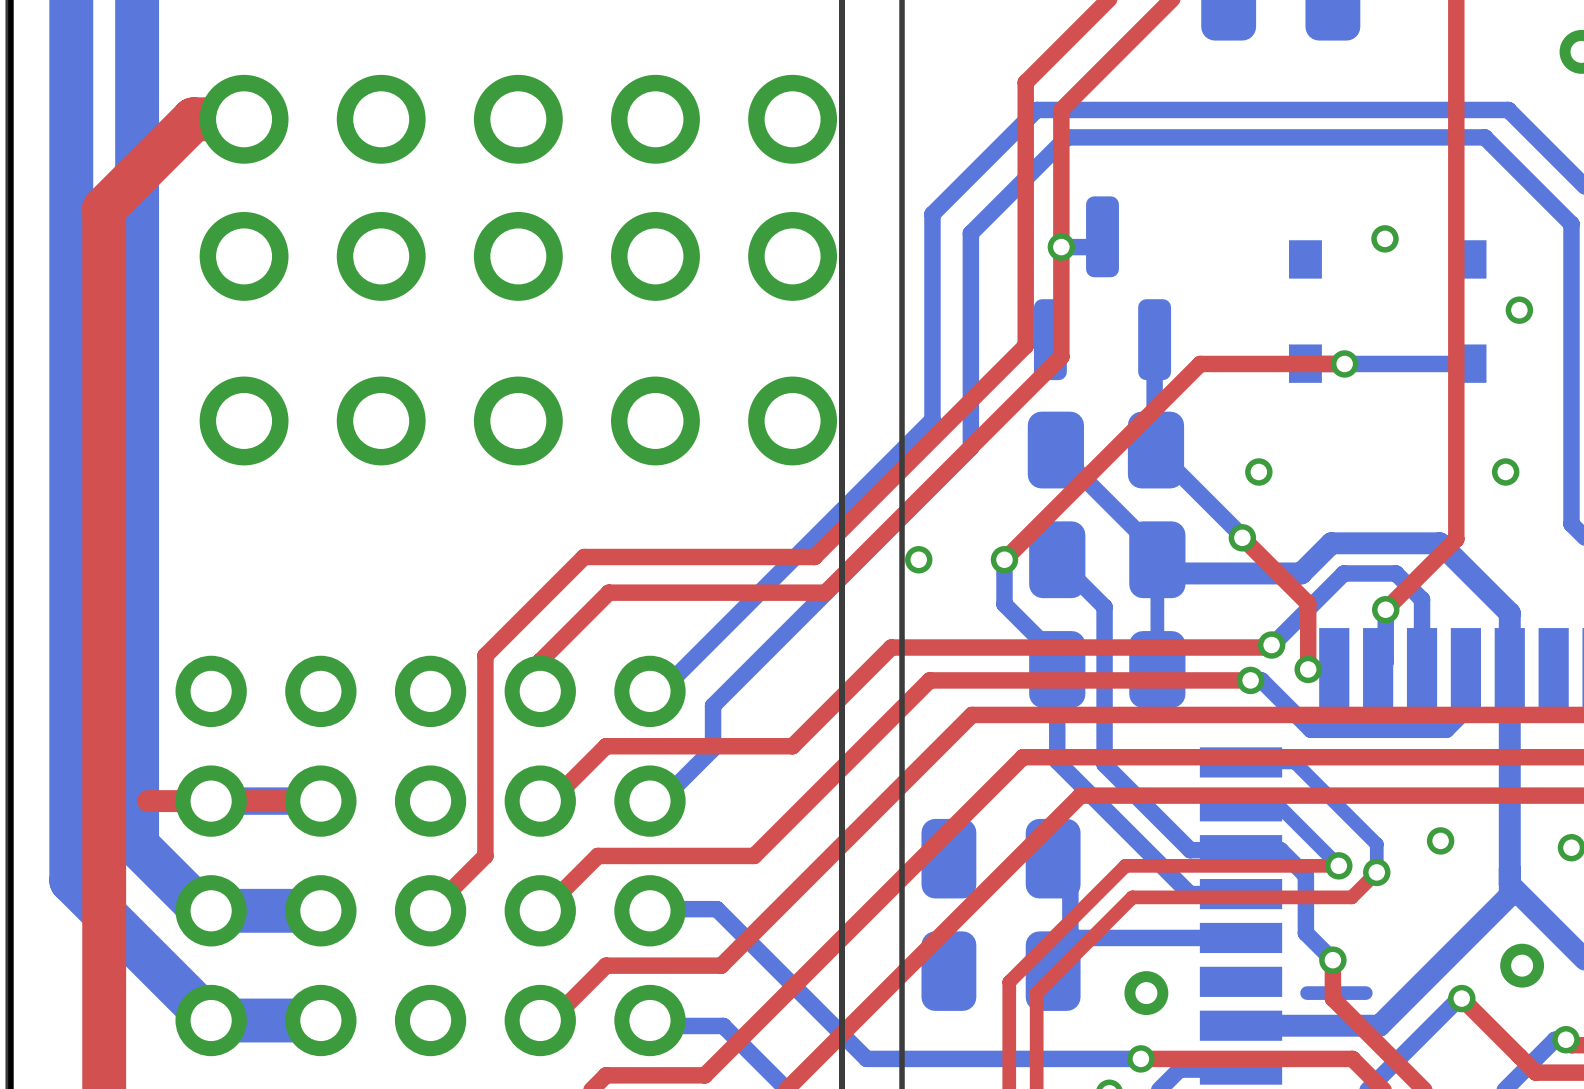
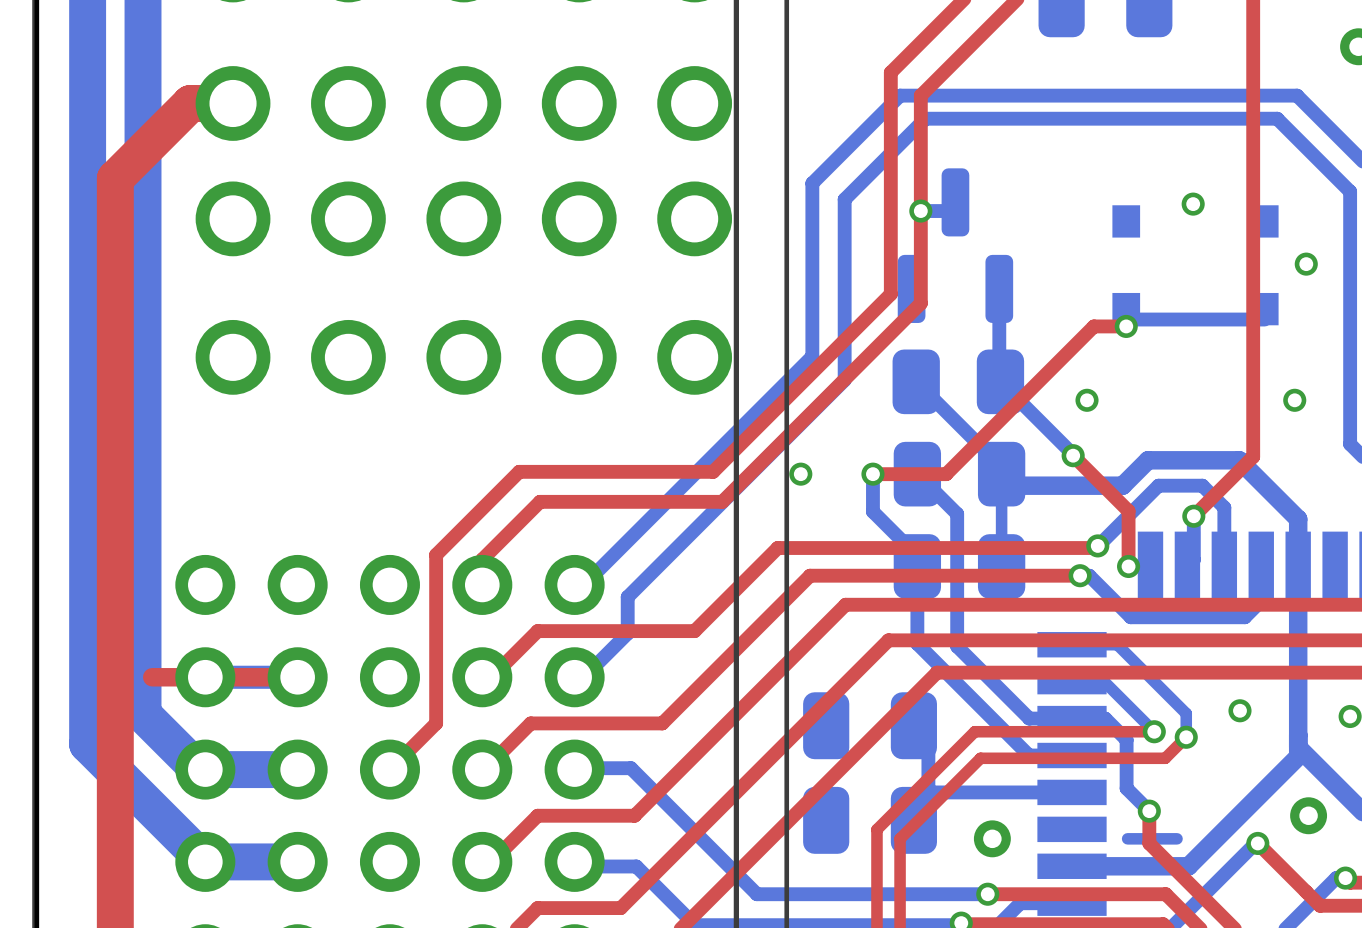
bottom track: (1322, 363) (1469, 363) -> none
top track: (1344, 363) (1200, 363) (1004, 559) -> (1126, 326) (1093, 326) (946, 474) (872, 474)
via position: (1344, 363) -> (1126, 326)
bottom track: none -> (1130, 319) (1264, 319)

